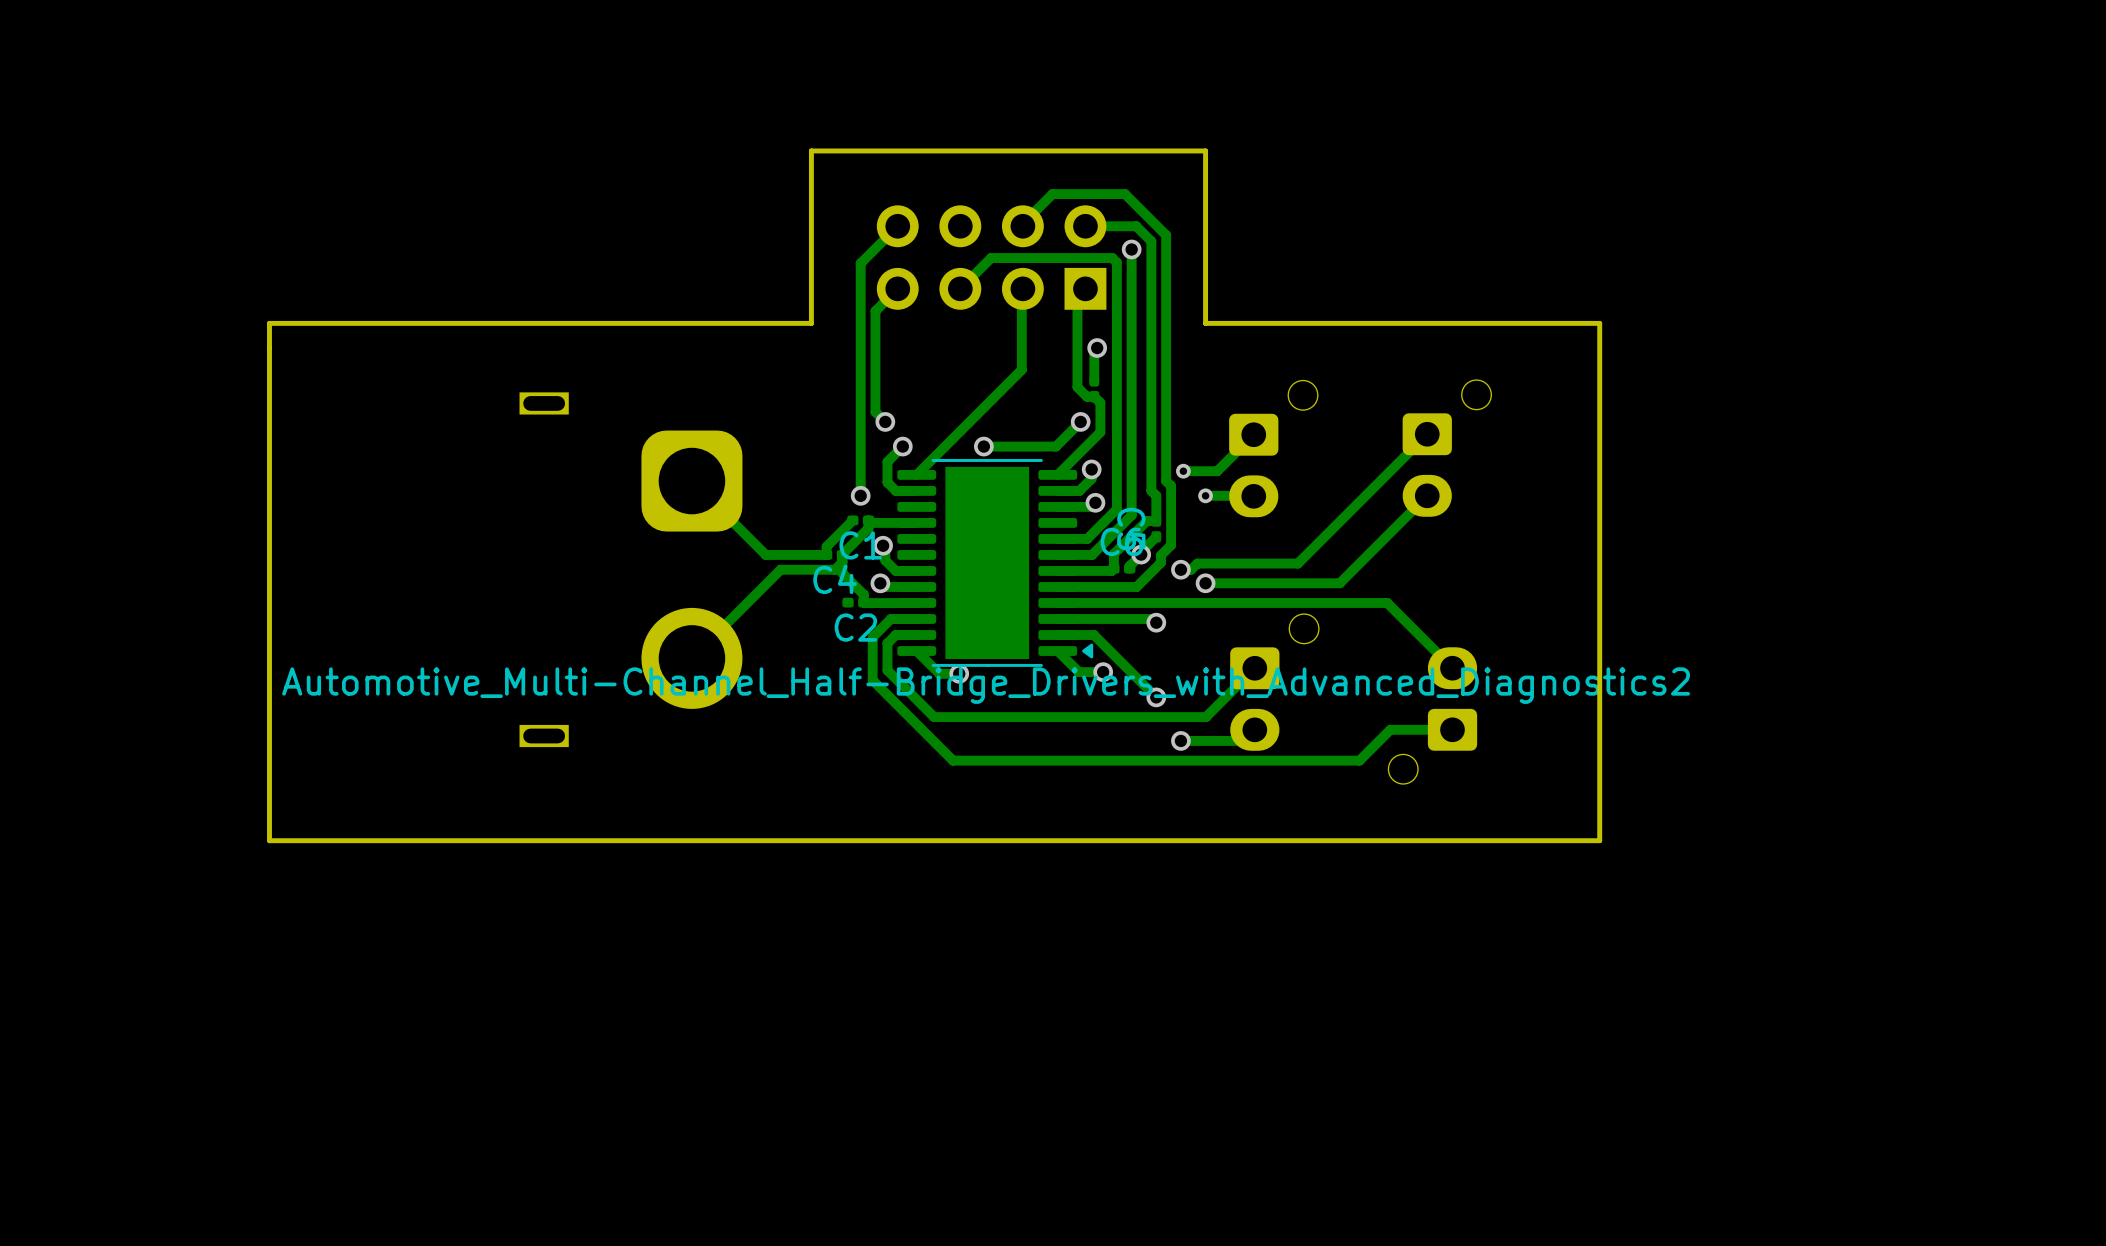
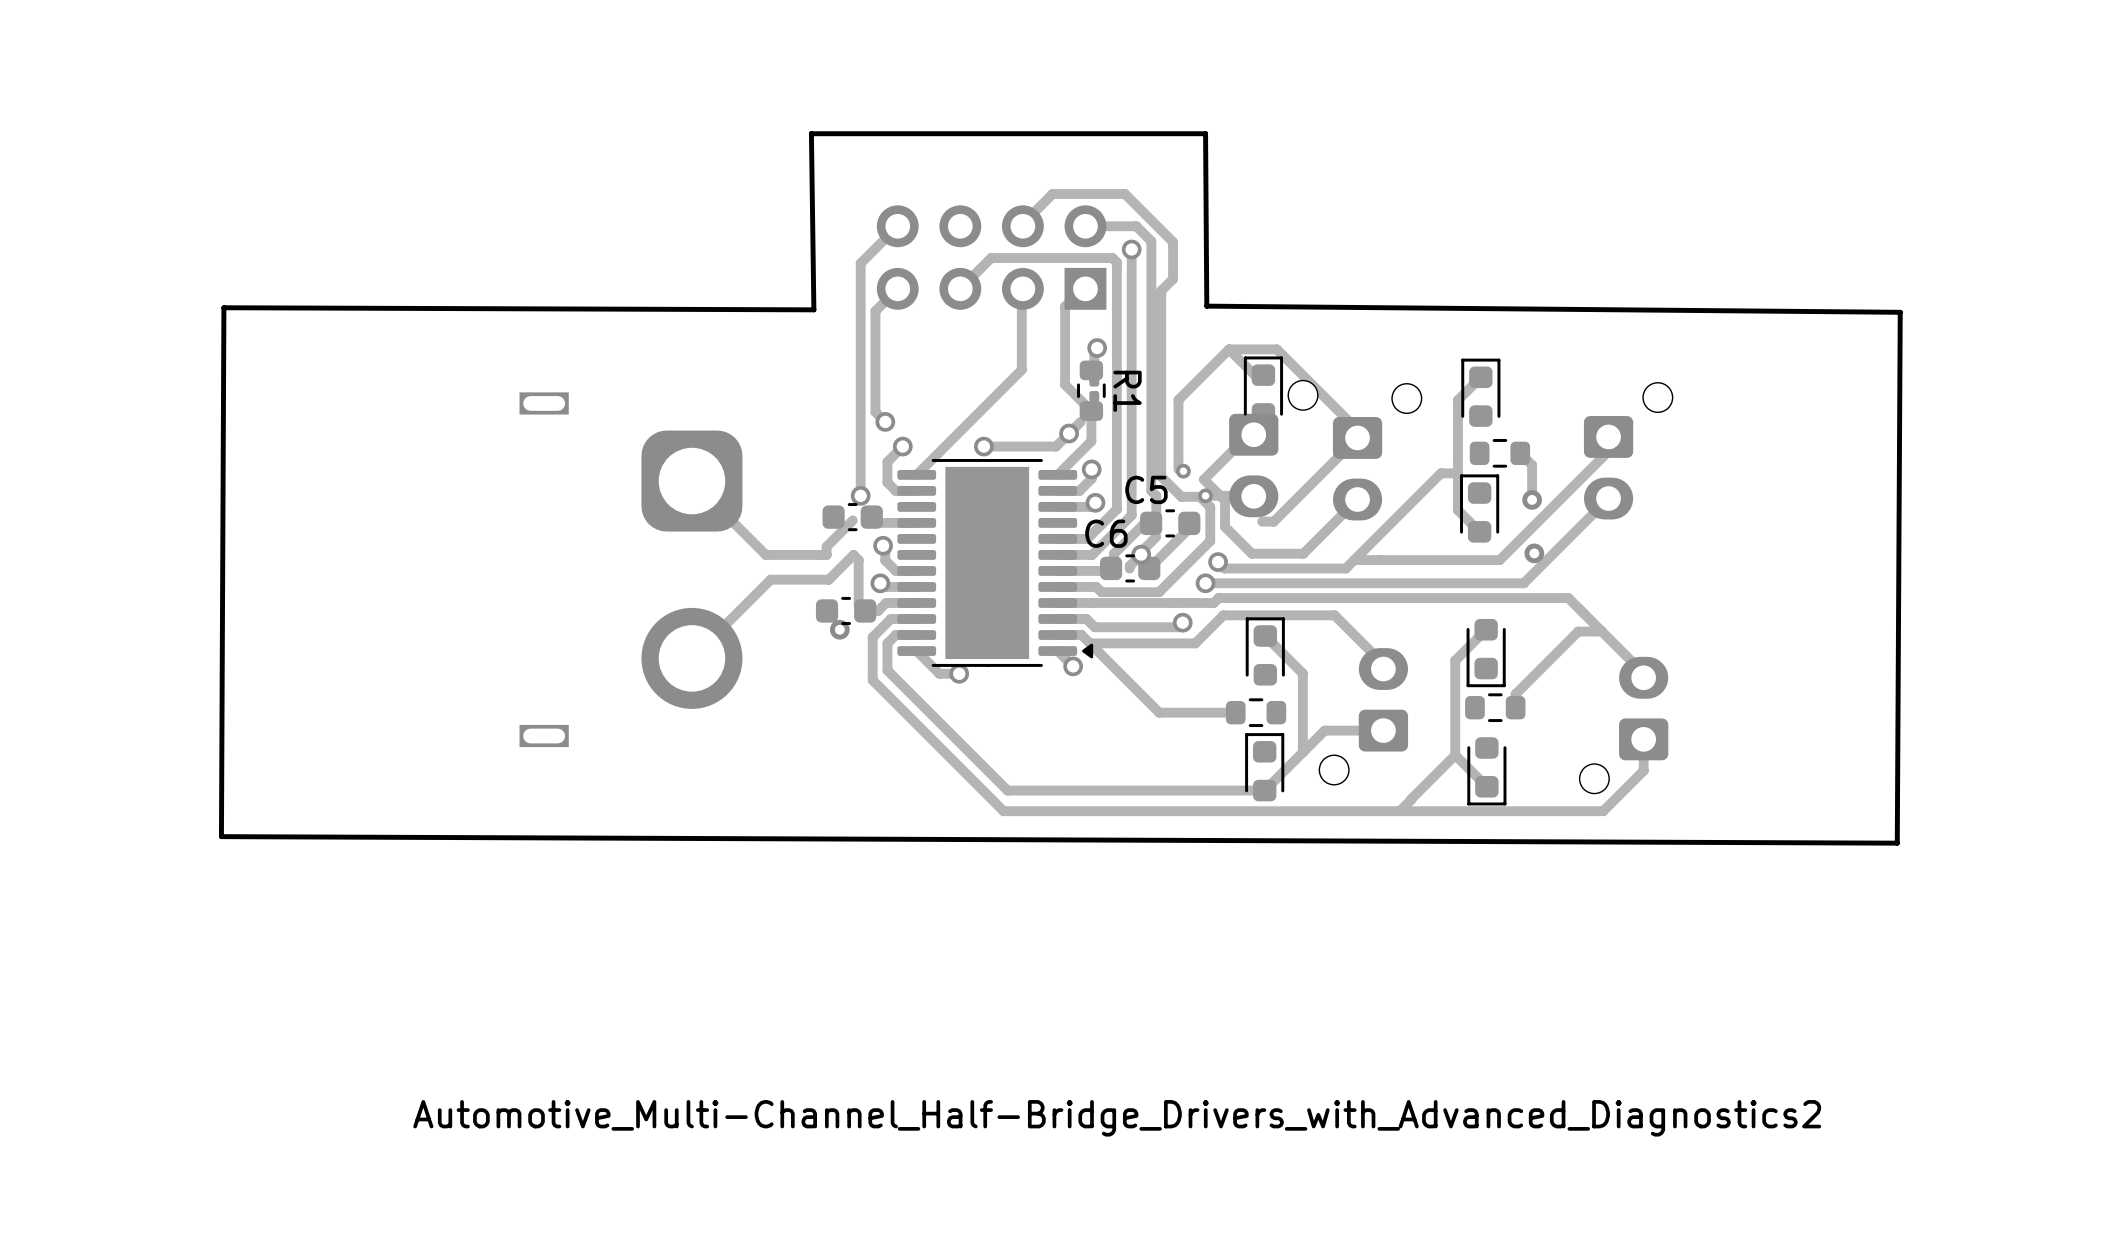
board edge: (1205, 150) (1205, 323) (1599, 323) (1599, 840) (269, 840) (269, 323) (811, 323) (811, 150) (1205, 150) -> (1205, 133) (1206, 306) (1900, 312) (1897, 843) (221, 836) (223, 307) (813, 309) (811, 133) (1205, 133)
track: (1166, 235) (1166, 481) (1171, 485) (1171, 545) (1160, 555) (1160, 562) (1136, 586) (1096, 586) -> (1166, 235) (1173, 242) (1173, 279) (1161, 290) (1161, 476) (1181, 496) (1199, 496) (1210, 507) (1210, 541) (1159, 592) (1101, 592) (1096, 586)
track: (1077, 294) (1077, 387) (1086, 396) (1094, 396) (1100, 402) (1100, 432) (1091, 441) -> (1077, 294) (1065, 306) (1065, 384) (1091, 411) (1091, 441)
track: none -> (1229, 349) (1178, 399) (1178, 469)
track: none -> (1229, 349) (1254, 375) (1263, 375)
track: none -> (1229, 349) (1276, 349) (1357, 430) (1357, 437) (1273, 521) (1262, 521)
track: none -> (1480, 377) (1457, 400) (1457, 510) (1479, 531)
R1: none -> (1091, 390)
part: none -> (1263, 390)
part: none -> (1480, 392)
via position: (1080, 421) -> (1069, 433)
track: (1242, 434) (1253, 434) (1217, 471) (1183, 471) -> none
track: (1427, 434) (1297, 563) (1197, 563) (1191, 569) (1180, 569) -> none
track: none -> (1608, 436) (1608, 451) (1499, 560) (1354, 560)
part position: (1446, 448) -> (1377, 452)
track: none -> (1232, 451) (1203, 479) (1225, 500) (1225, 526) (1251, 553) (1303, 553) (1357, 499)
part: none -> (1628, 451)
part: none -> (1499, 453)
track: none -> (1520, 453) (1532, 465) (1532, 499)
track: none -> (1457, 473) (1440, 473) (1345, 568) (1224, 568) (1218, 562)
track: (1427, 495) (1339, 583) -> (1589, 498) (1608, 498) (1523, 583) (1339, 583)
via: none -> (1532, 499)
part: none -> (1479, 508)
C5 footprint: [1151, 515, 1162, 543] -> [1140, 509, 1201, 538]
part: none -> (852, 517)
C1: (860, 520) -> none
track: (868, 520) (868, 528) (842, 554) (842, 573) (863, 594) (864, 603) (886, 602) -> none
track: none -> (1189, 523) (1189, 528) (1151, 565) (1148, 565)
via: none -> (1534, 553)
C4: (834, 554) -> none
track: (842, 562) (834, 569) (780, 569) (770, 579) -> (886, 602) (878, 610) (865, 610) (858, 604) (858, 559) (853, 554) (828, 579) (770, 579)
via: none -> (1218, 562)
C6 footprint: [1108, 563, 1136, 574] -> [1100, 554, 1161, 583]
via: (1180, 569) -> none
C2: (855, 602) -> none
track: (1213, 602) (1387, 602) (1452, 668) -> (1213, 602) (1218, 598) (1568, 598) (1643, 673) (1643, 677)
part: none -> (846, 610)
track: (1086, 619) (1152, 619) (1156, 622) -> (1086, 619) (1094, 627) (1178, 627) (1182, 622)
via: (1156, 622) -> none
via: none -> (1182, 622)
via: none -> (839, 629)
track: none -> (1486, 629) (1455, 660) (1455, 755)
track: none -> (1602, 631) (1578, 631) (1515, 694) (1515, 707)
track: (1081, 635) (1093, 635) (1156, 697) -> (1081, 635) (1159, 712) (1235, 712)
track: none -> (1265, 635) (1302, 673) (1302, 752)
track: none -> (1090, 643) (1195, 643) (1223, 615) (1334, 615) (1383, 664) (1383, 669)
part: none -> (1265, 651)
part: none -> (1486, 653)
track: (1073, 666) (1078, 672) (1103, 672) -> none
track: (1254, 668) (1206, 717) (934, 717) -> (1383, 730) (1324, 730) (1264, 790) (1007, 790) (934, 717)
via position: (1103, 672) -> (1073, 666)
part: (1274, 682) -> none
Automotive_Multi-Channel_Half-Bridge_Drivers_with_Advanced_Diagnostics2 name position: Automotive_Multi-Channel_Half-Bridge_Drivers_with_Advanced_Diagnostics2 (986, 685) -> Automotive_Multi-Channel_Half-Bridge_Drivers_with_Advanced_Diagnostics2 (1117, 1118)
via: (1156, 697) -> none
part: none -> (1495, 707)
part: none -> (1256, 712)
part: (1432, 715) -> none
part: none -> (1363, 716)
part: none -> (1623, 725)
track: (1254, 729) (1243, 740) (1180, 740) -> none
track: (1452, 729) (1390, 729) (1359, 760) (953, 760) -> (1643, 739) (1643, 770) (1603, 811) (1003, 811) (953, 760)
via: (1180, 740) -> none
track: none -> (1455, 755) (1399, 811)
track: none -> (1455, 755) (1486, 786)
part: none -> (1264, 767)
part: none -> (1486, 771)

